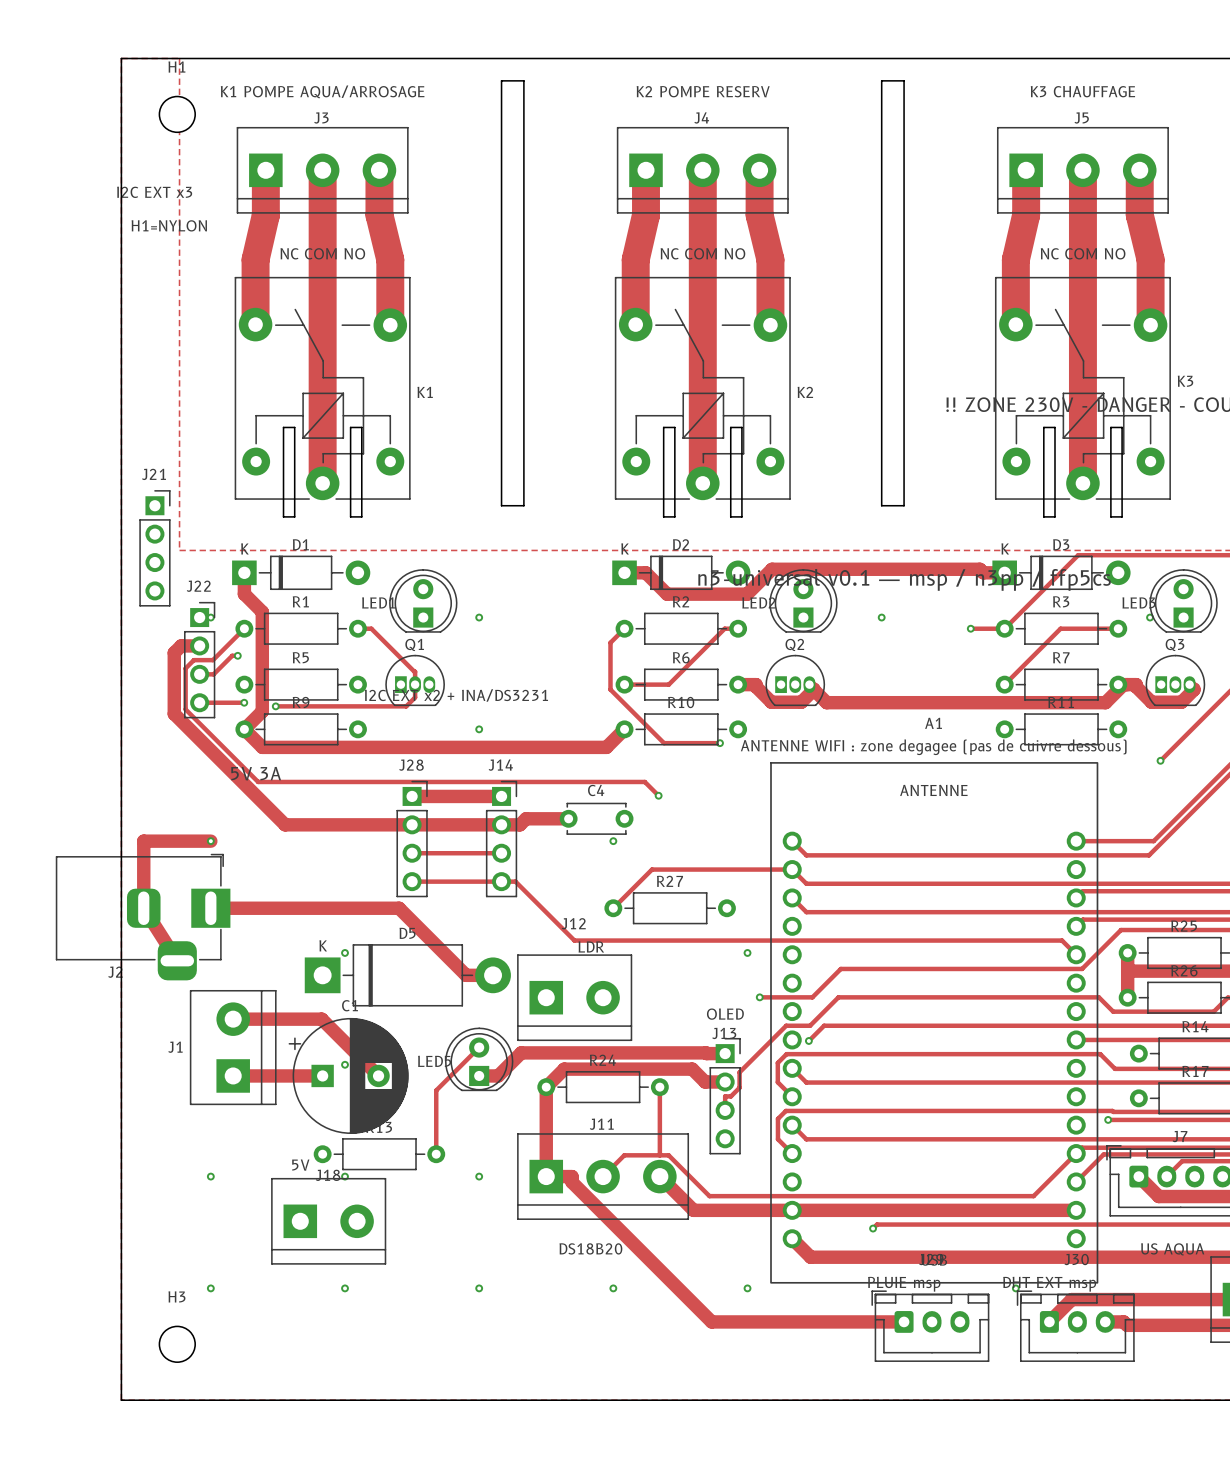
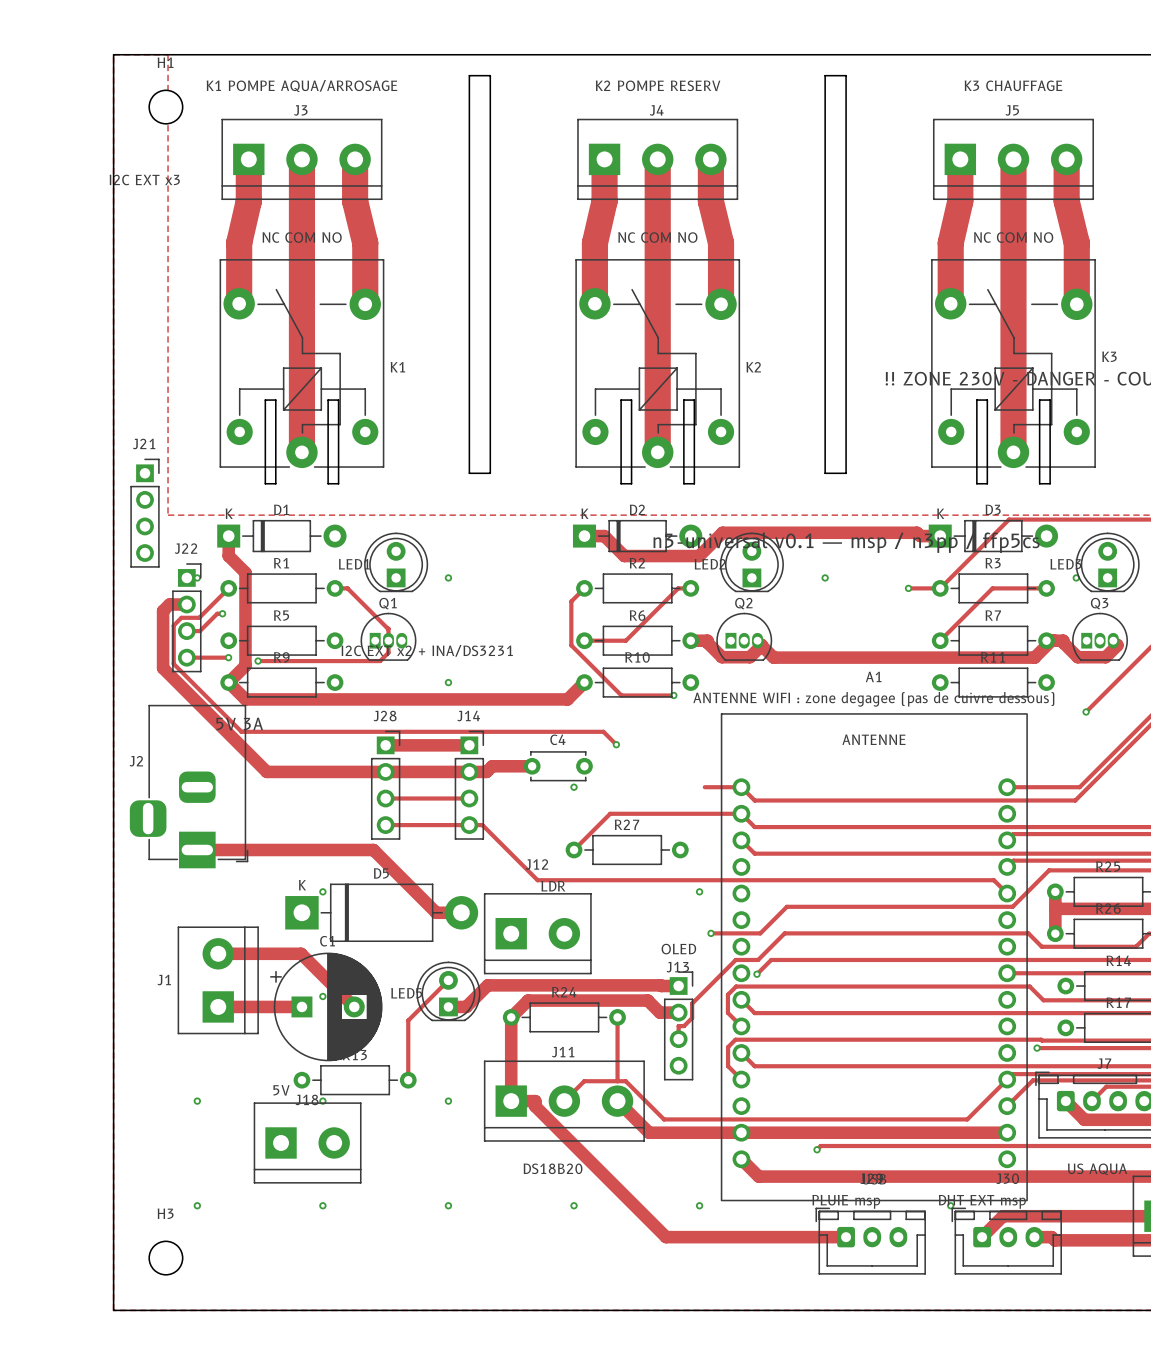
text: H1=NYLON (169, 225) -> none
track: (210, 841) (143, 841) (143, 908) (177, 960) -> none
track: none -> (704, 787) (741, 787)
J2 rotation: 0° (143, 917) -> 90° clockwise (189, 786)

